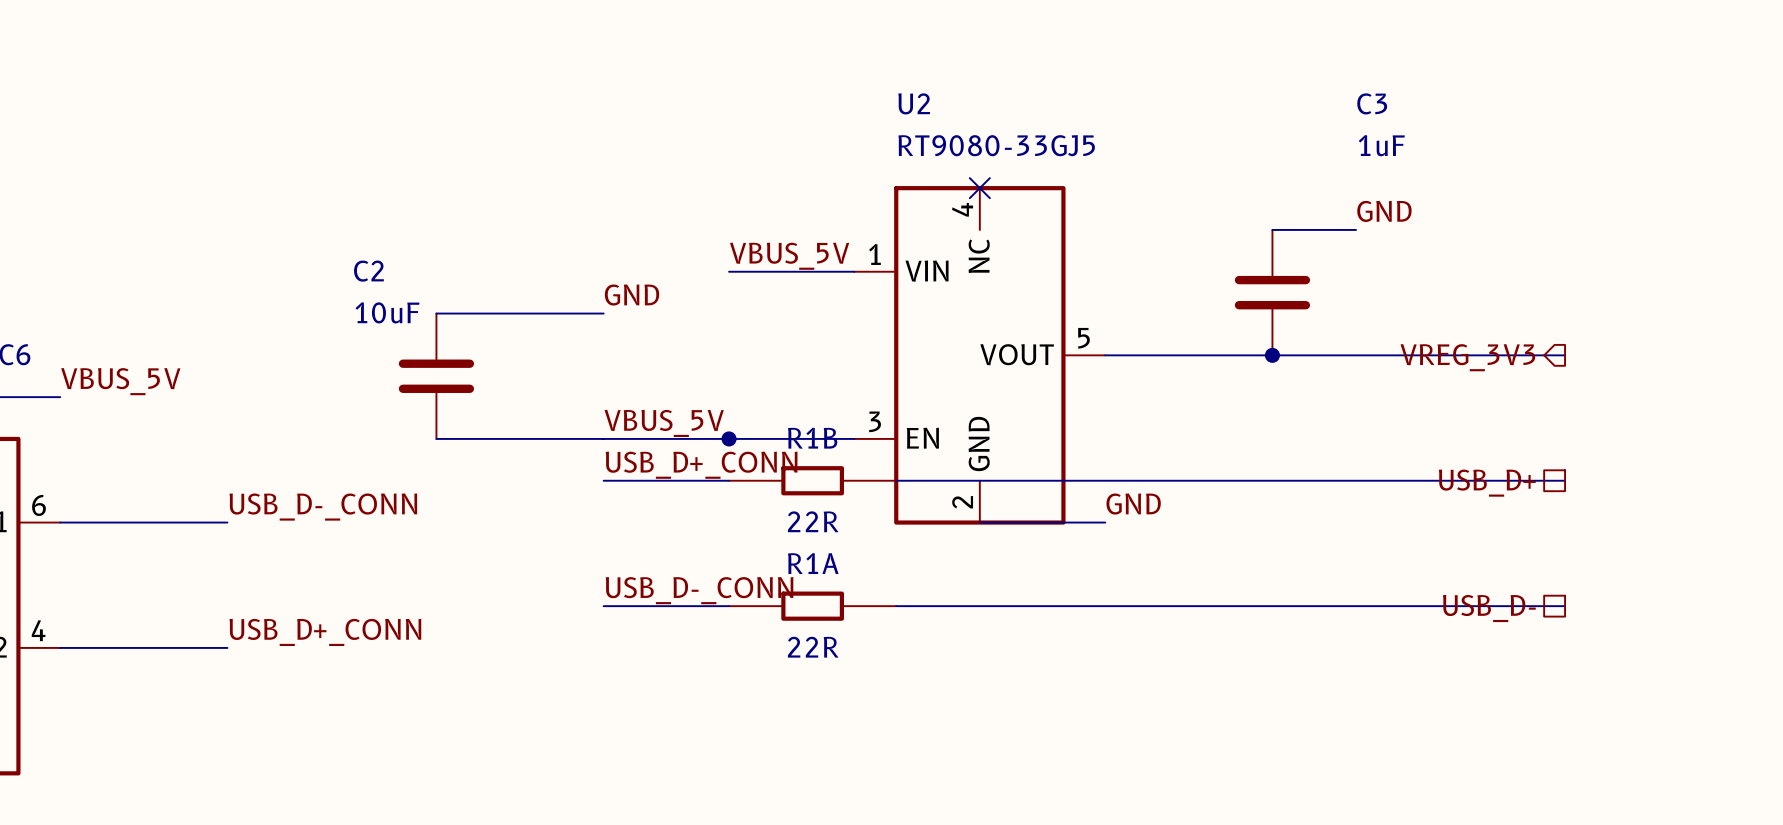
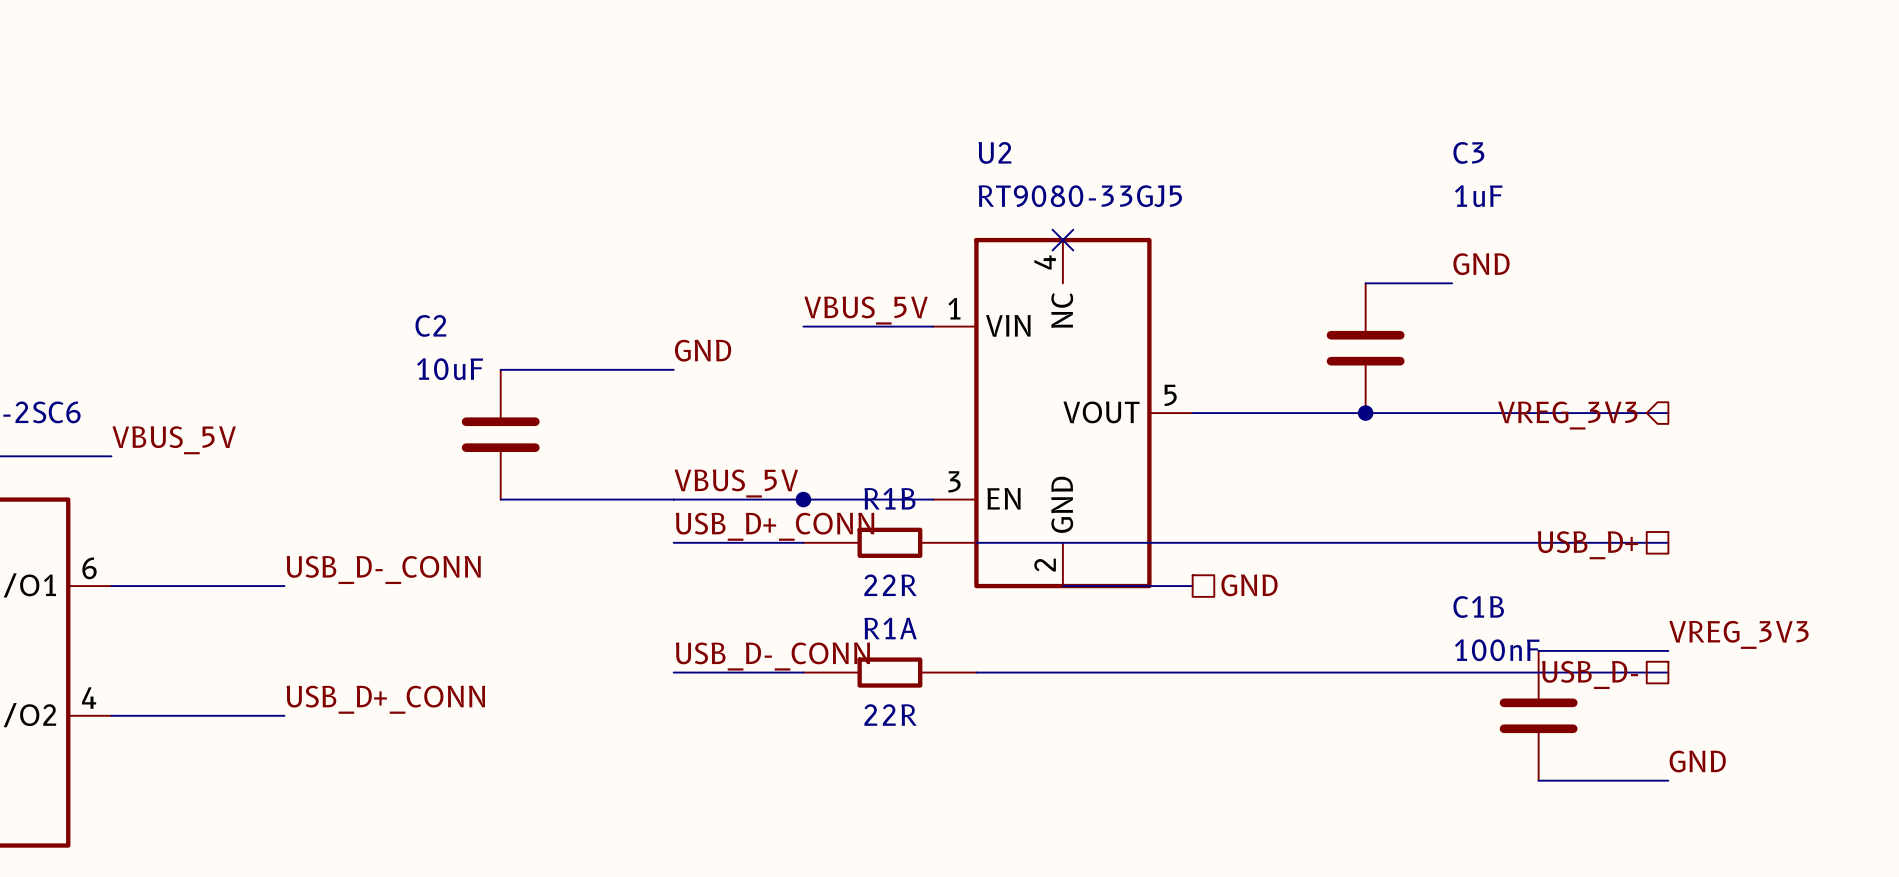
label: GND (1133, 504) -> none
hierarchical label: none -> GND (1249, 585)
label: none -> VREG_3V3 (1738, 634)
wire: none -> (1538, 650) (1668, 650)
C1B: none -> 100nF (1538, 715)
label: none -> GND (1697, 761)
wire: none -> (1538, 780) (1668, 780)

